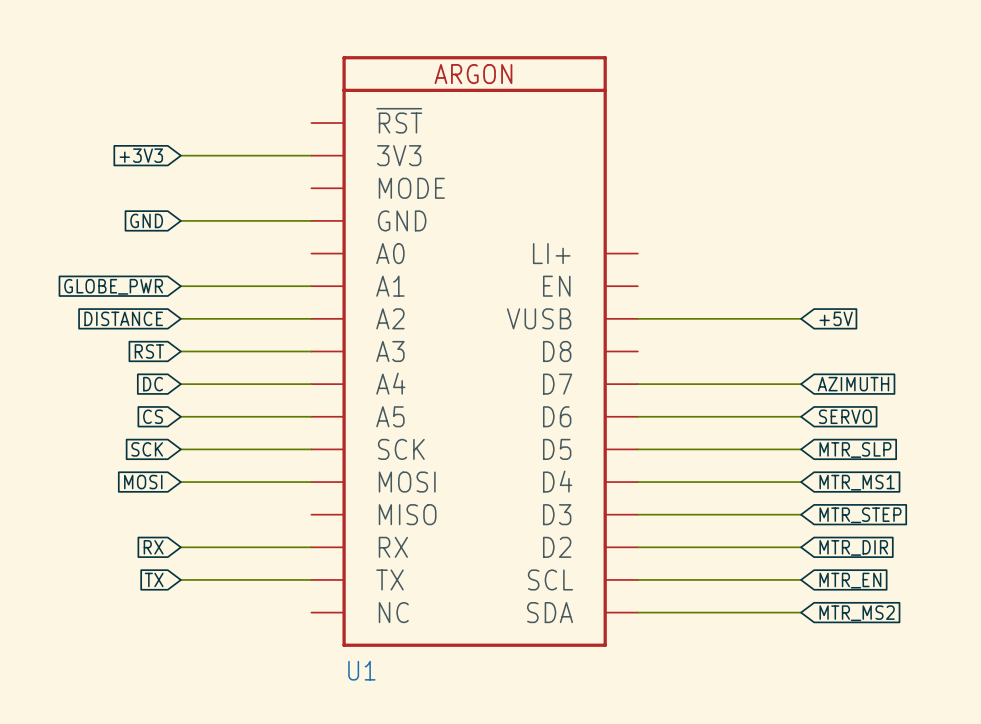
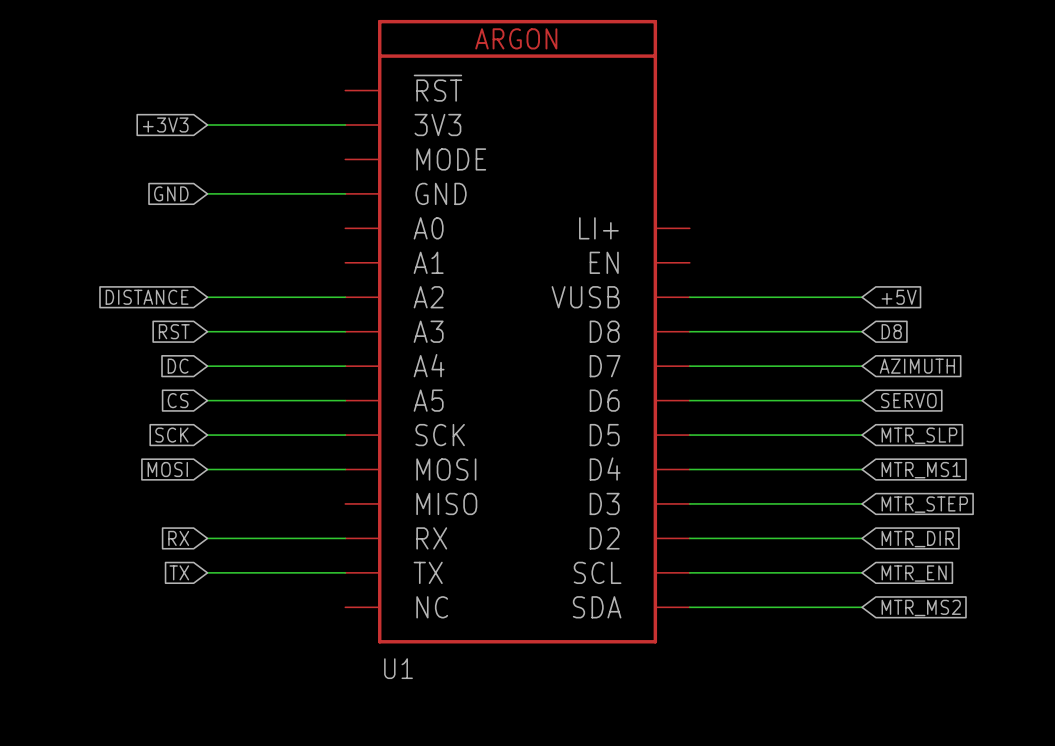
global label: GLOBE_PWR (113, 286) -> none
wire: (180, 286) (311, 286) -> none
wire: none -> (689, 331) (862, 331)
global label: none -> D8 (891, 331)

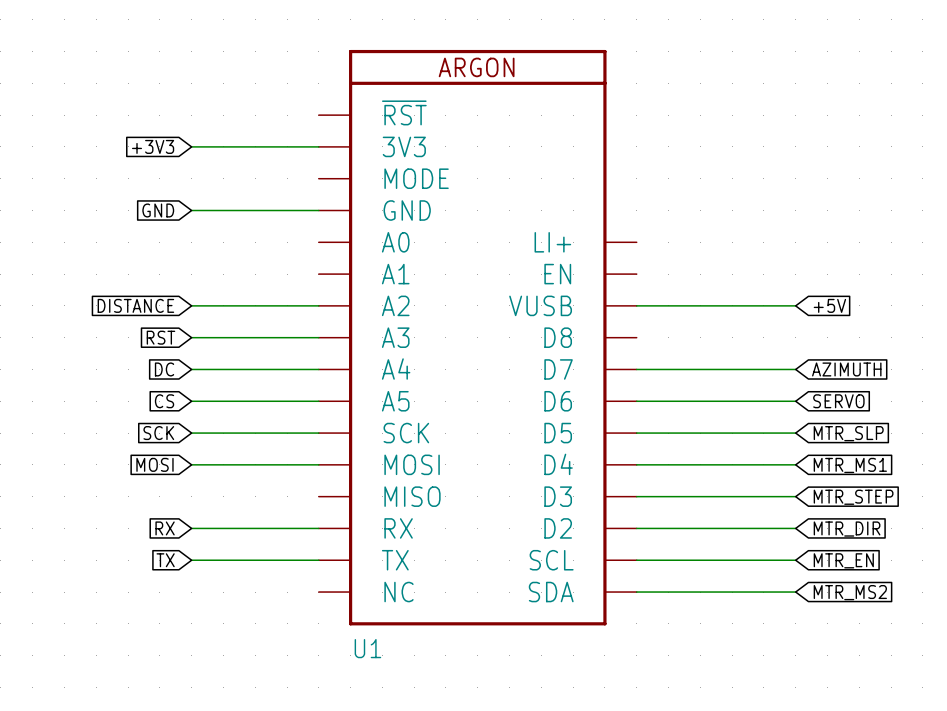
wire: (689, 331) (862, 331) -> none
global label: D8 (891, 331) -> none

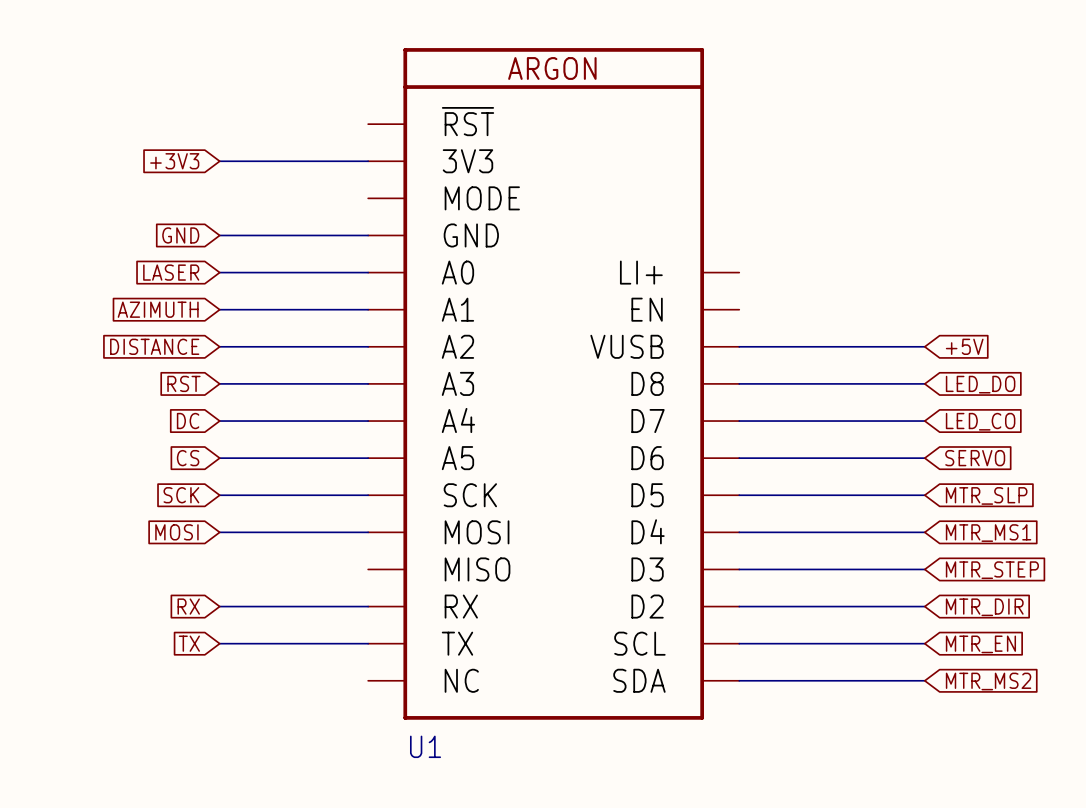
global label: none -> LASER (171, 272)
wire: none -> (219, 272) (368, 272)
global label: none -> AZIMUTH (158, 309)
wire: none -> (219, 309) (368, 309)
wire: none -> (739, 383) (924, 383)
global label: none -> LED_DO (980, 384)
global label: AZIMUTH (846, 369) -> LED_CO (980, 421)

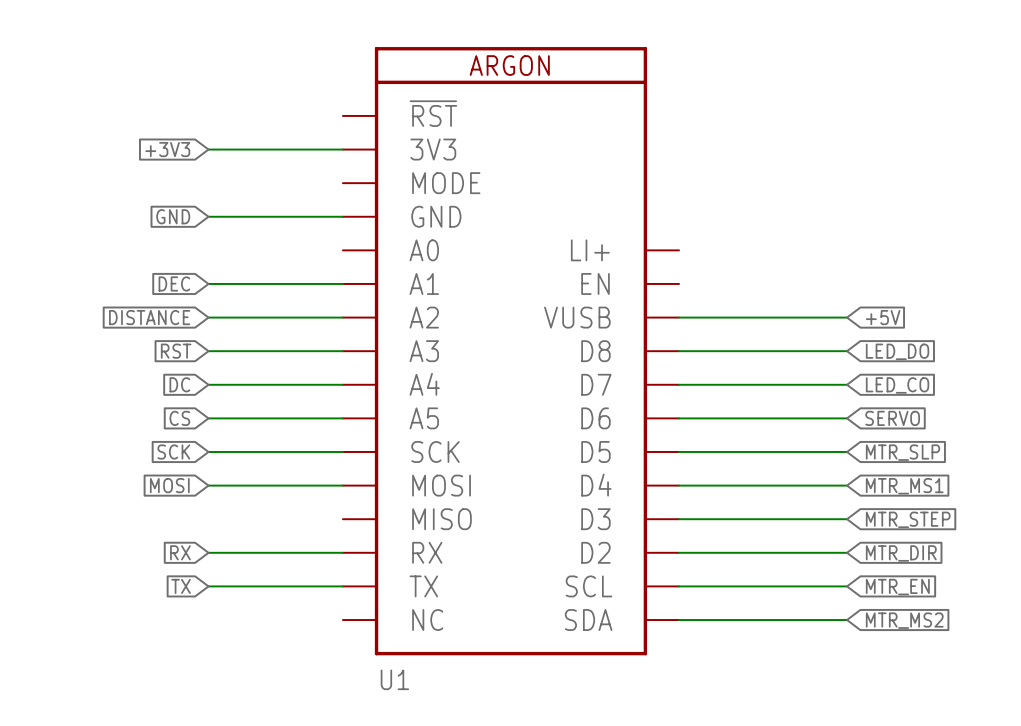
global label: LASER (171, 272) -> none
wire: (219, 272) (368, 272) -> none
global label: AZIMUTH (158, 309) -> DEC (174, 283)

